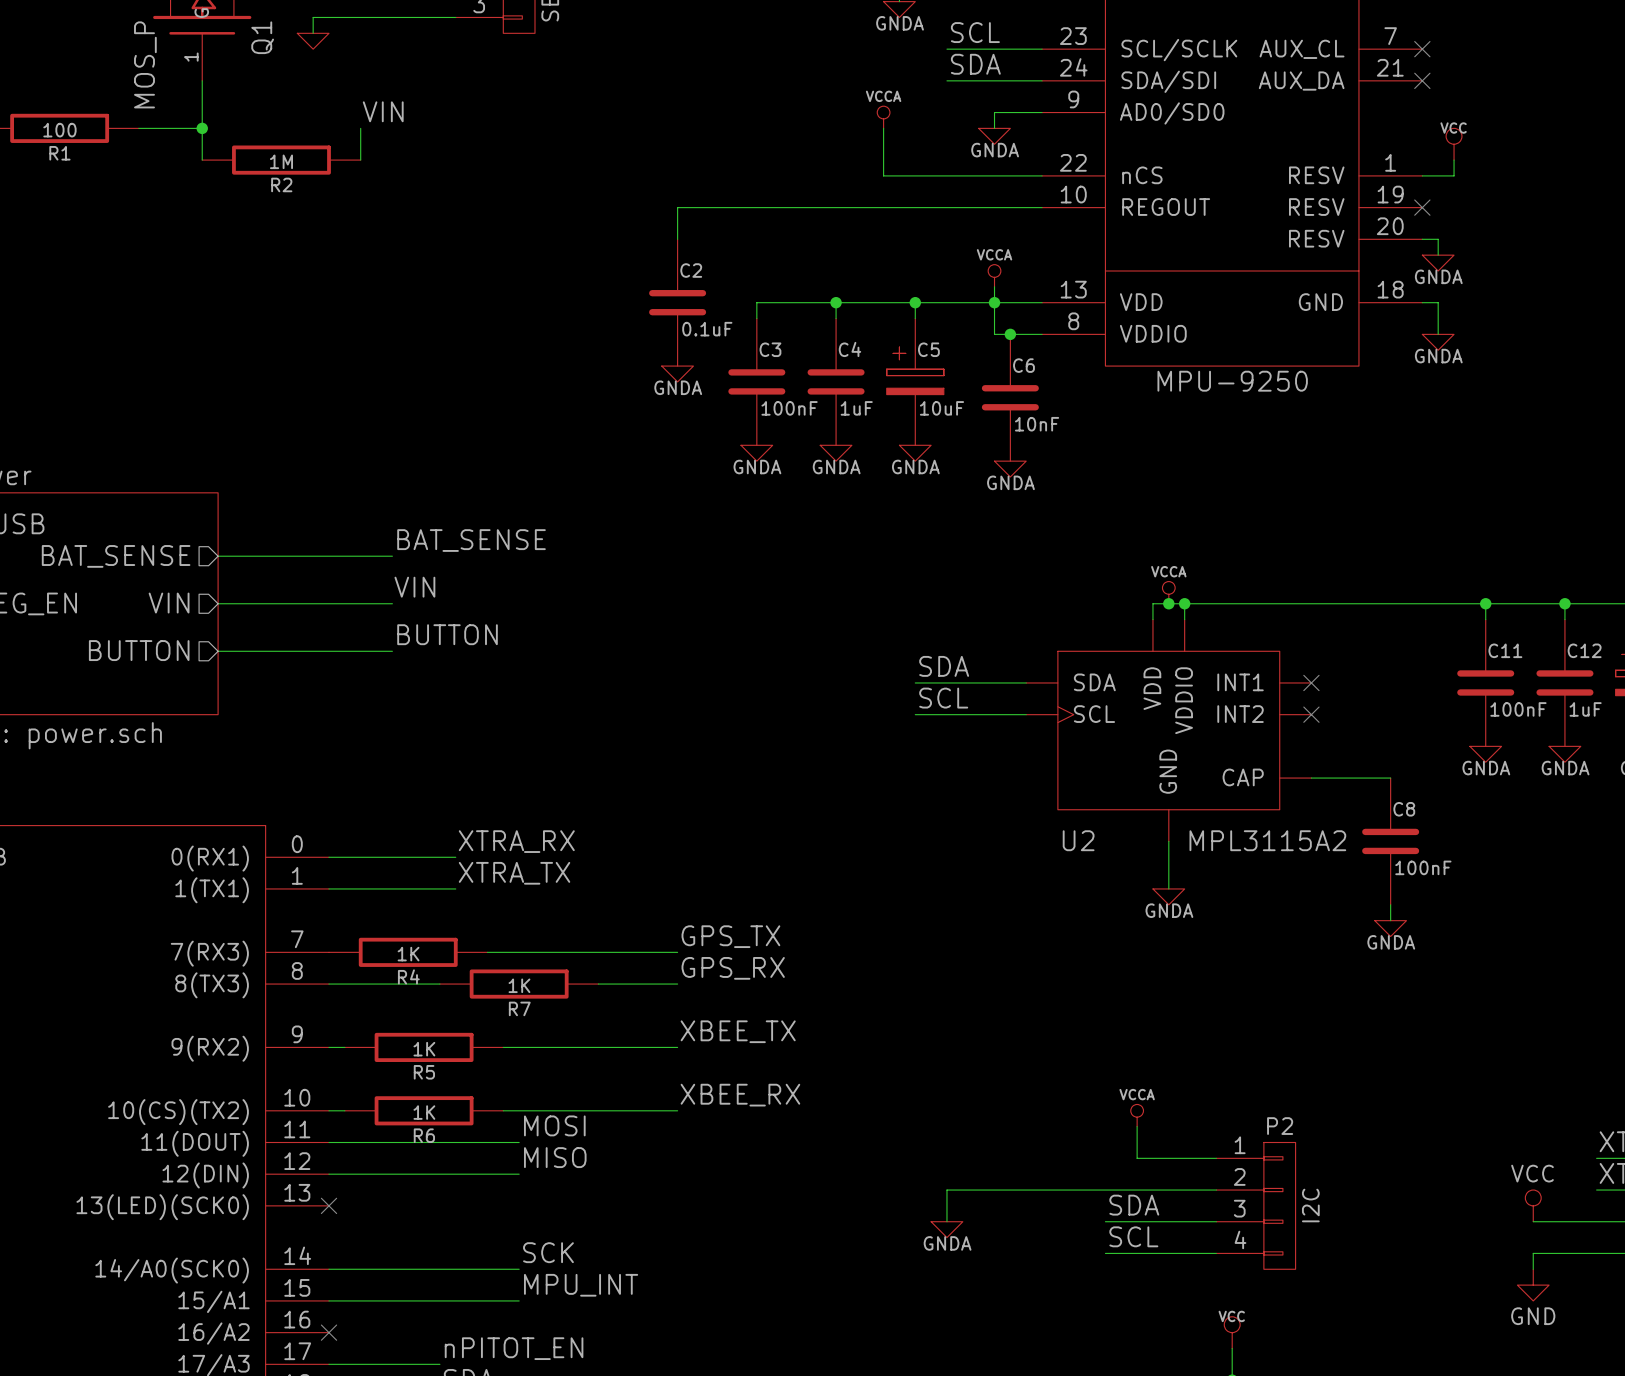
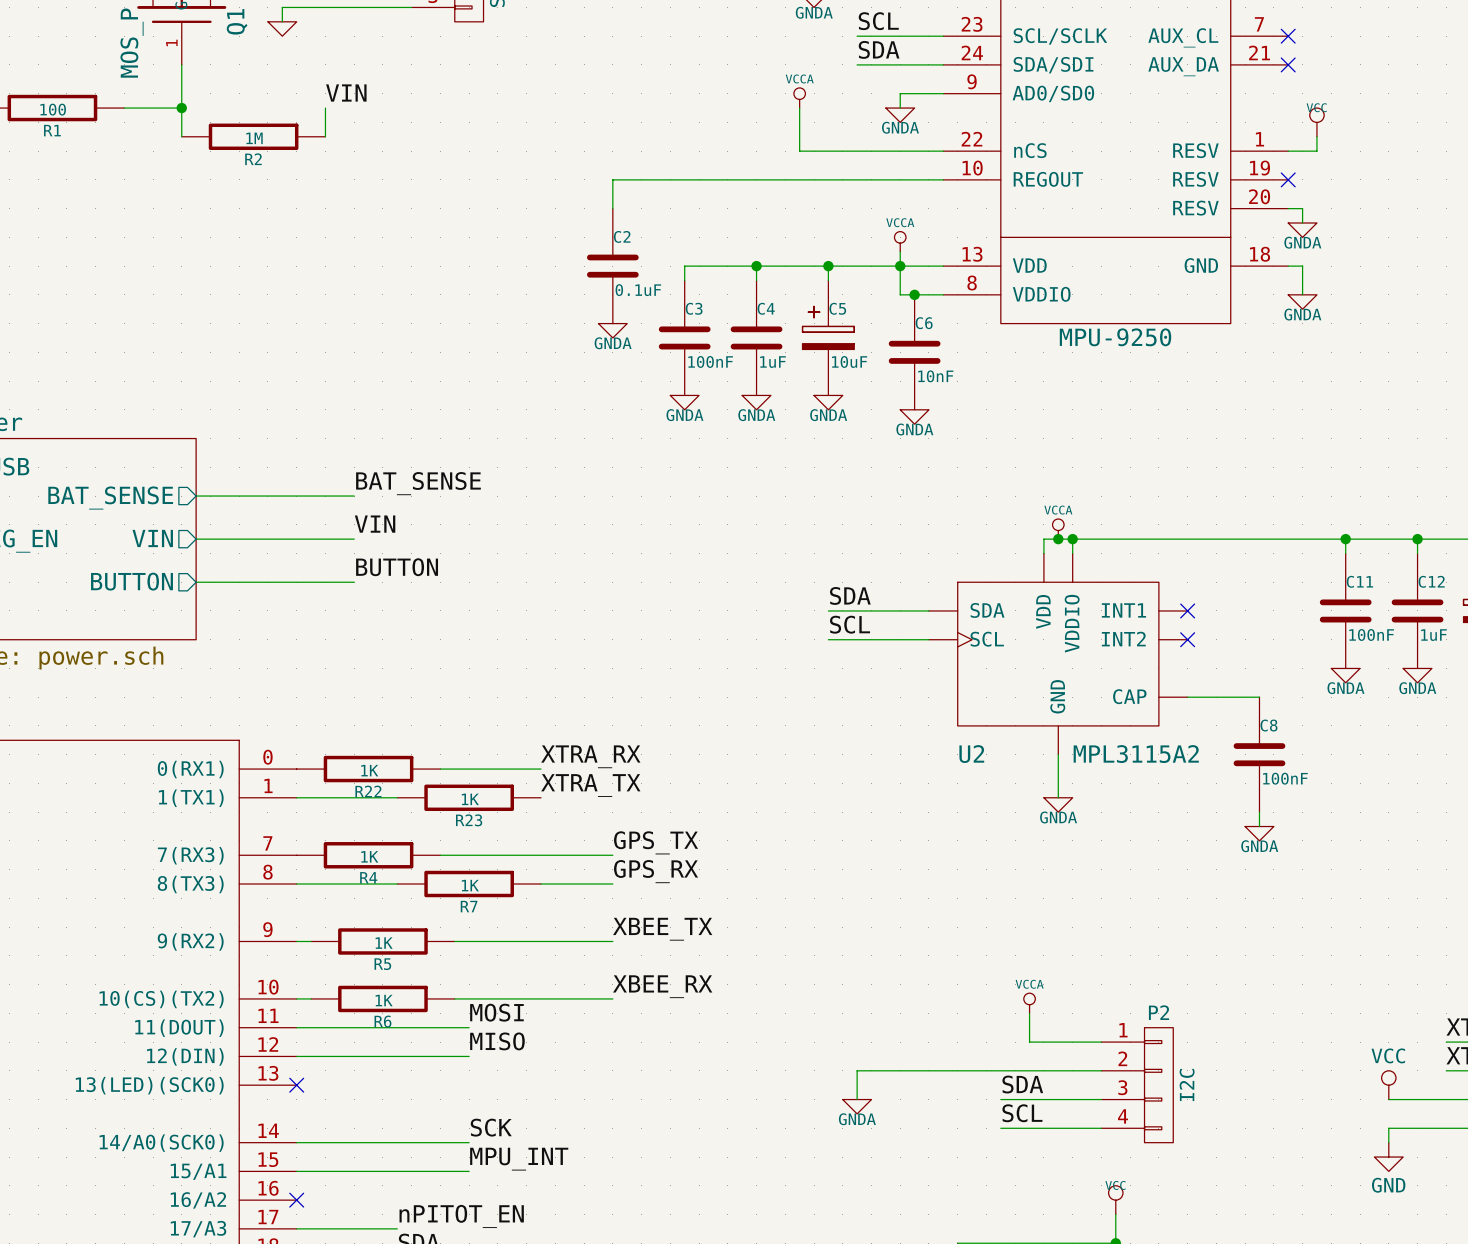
label position: XTRA_RX (516, 841) -> XTRA_RX (590, 756)
wire: (329, 857) (455, 857) -> none
R22: none -> 1K (368, 769)
wire: none -> (440, 769) (540, 769)
label position: XTRA_TX (514, 873) -> XTRA_TX (590, 785)
R23: none -> 1K (469, 797)

